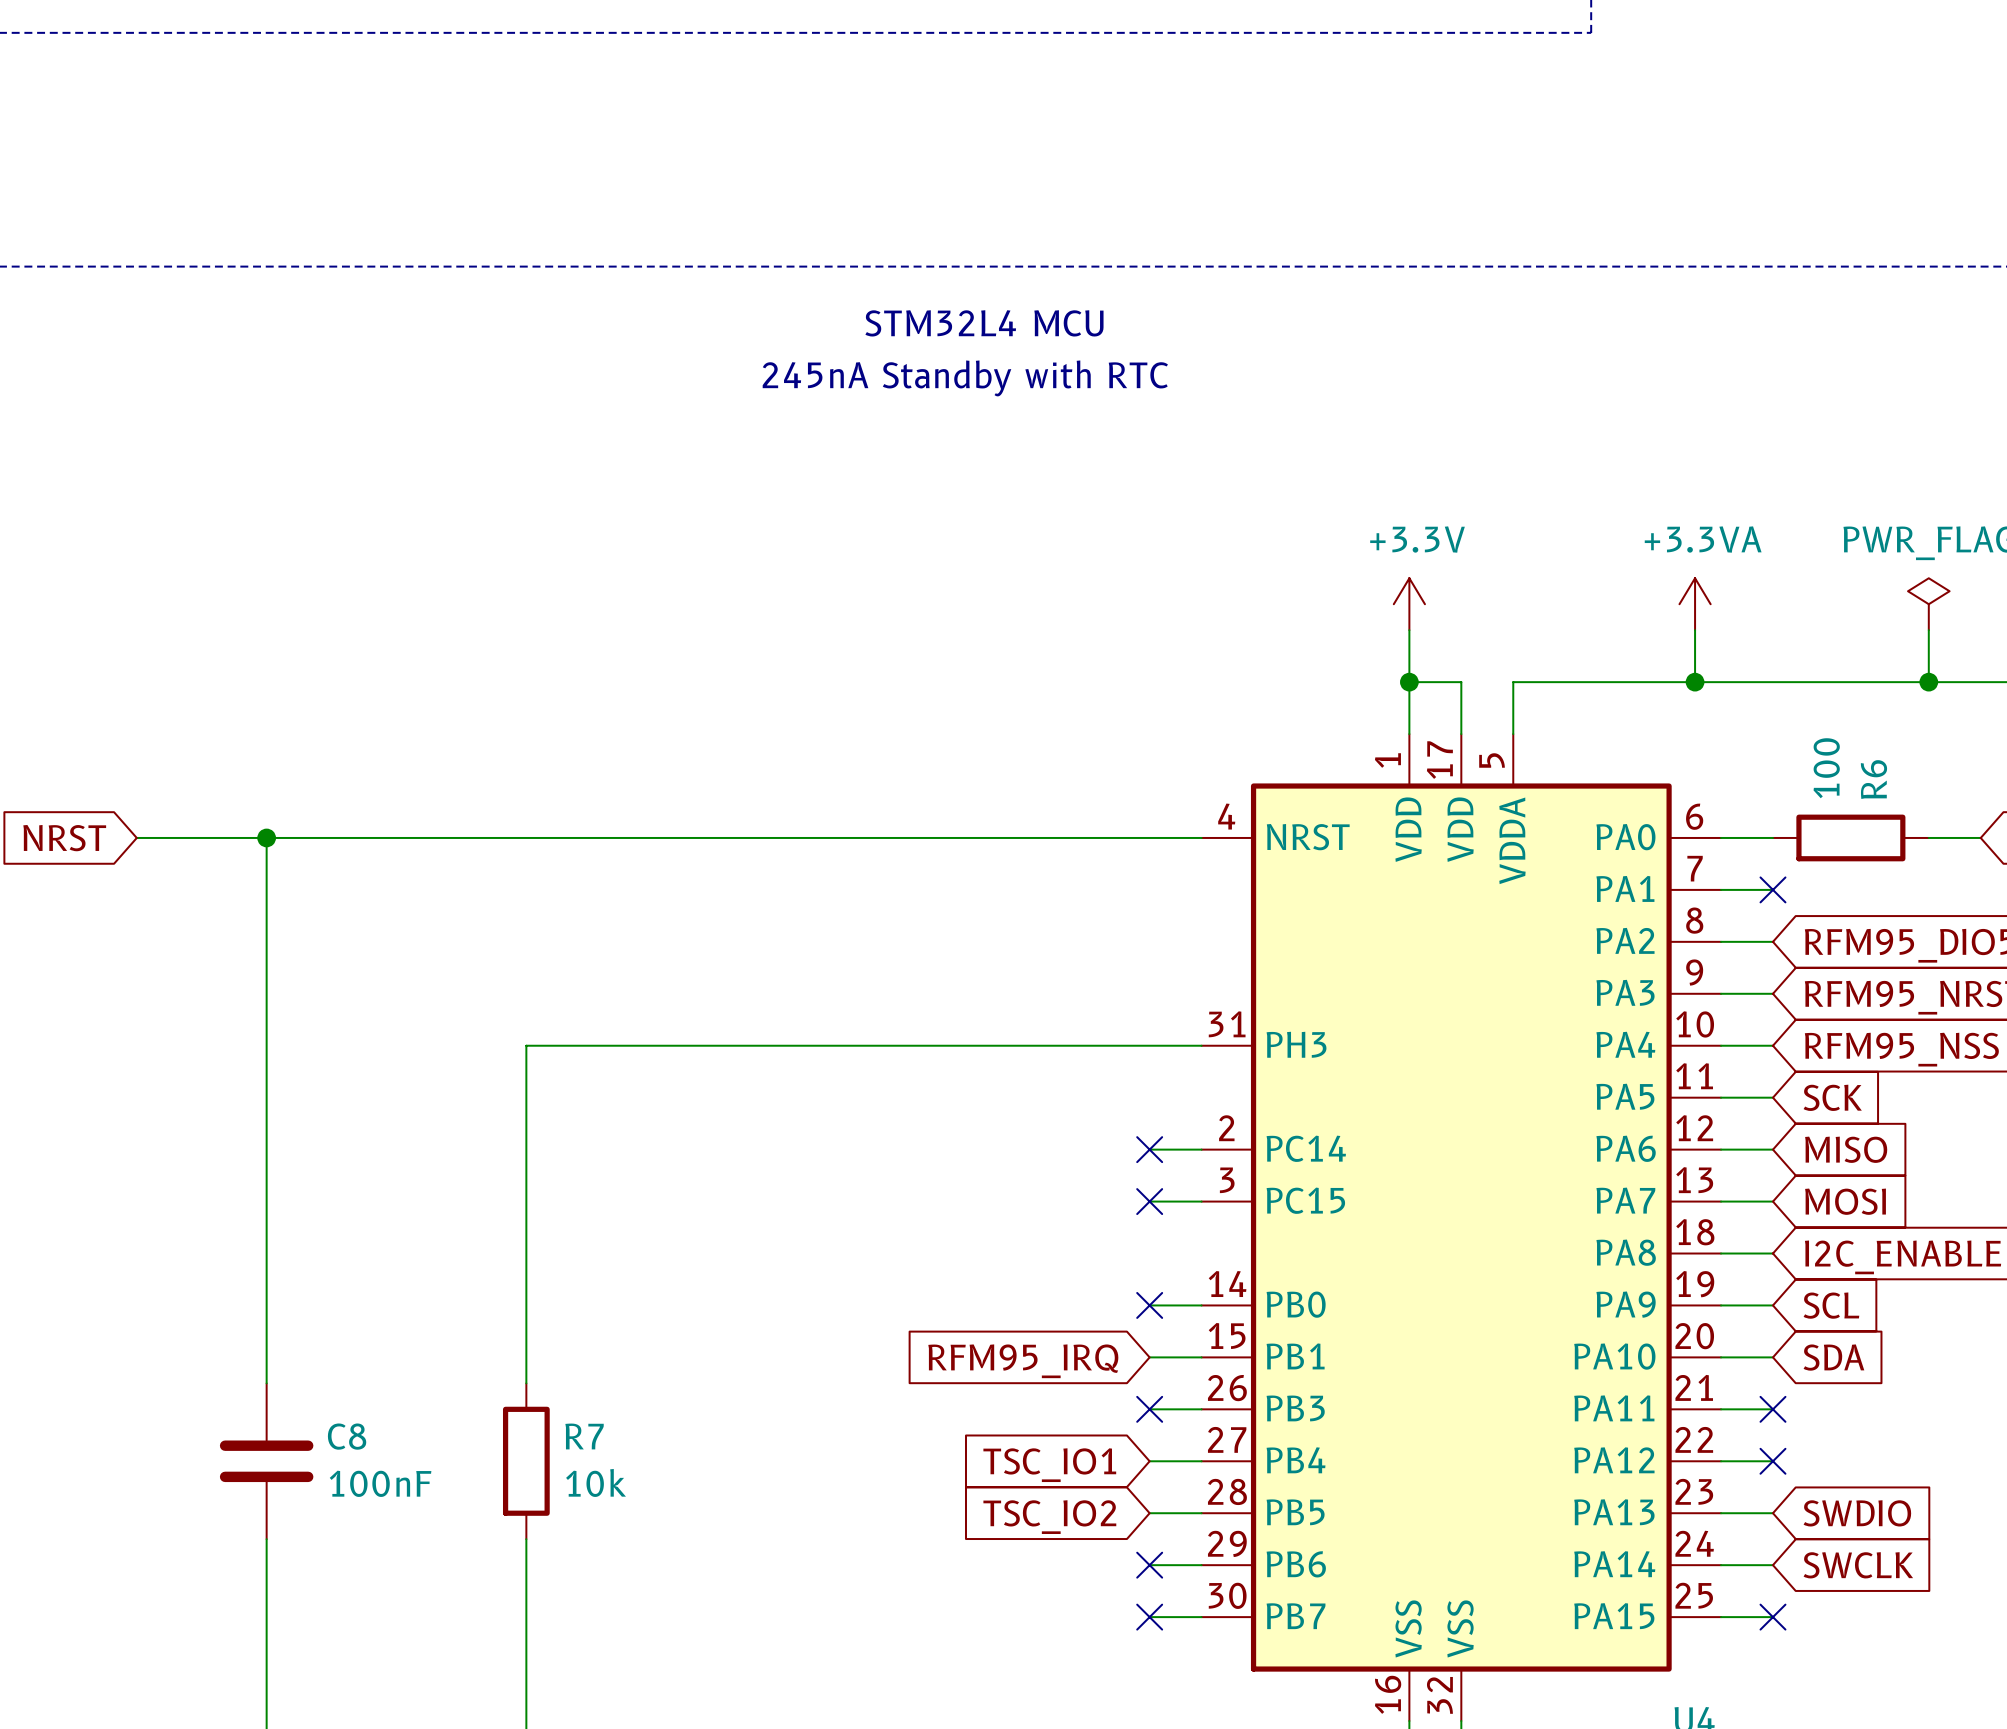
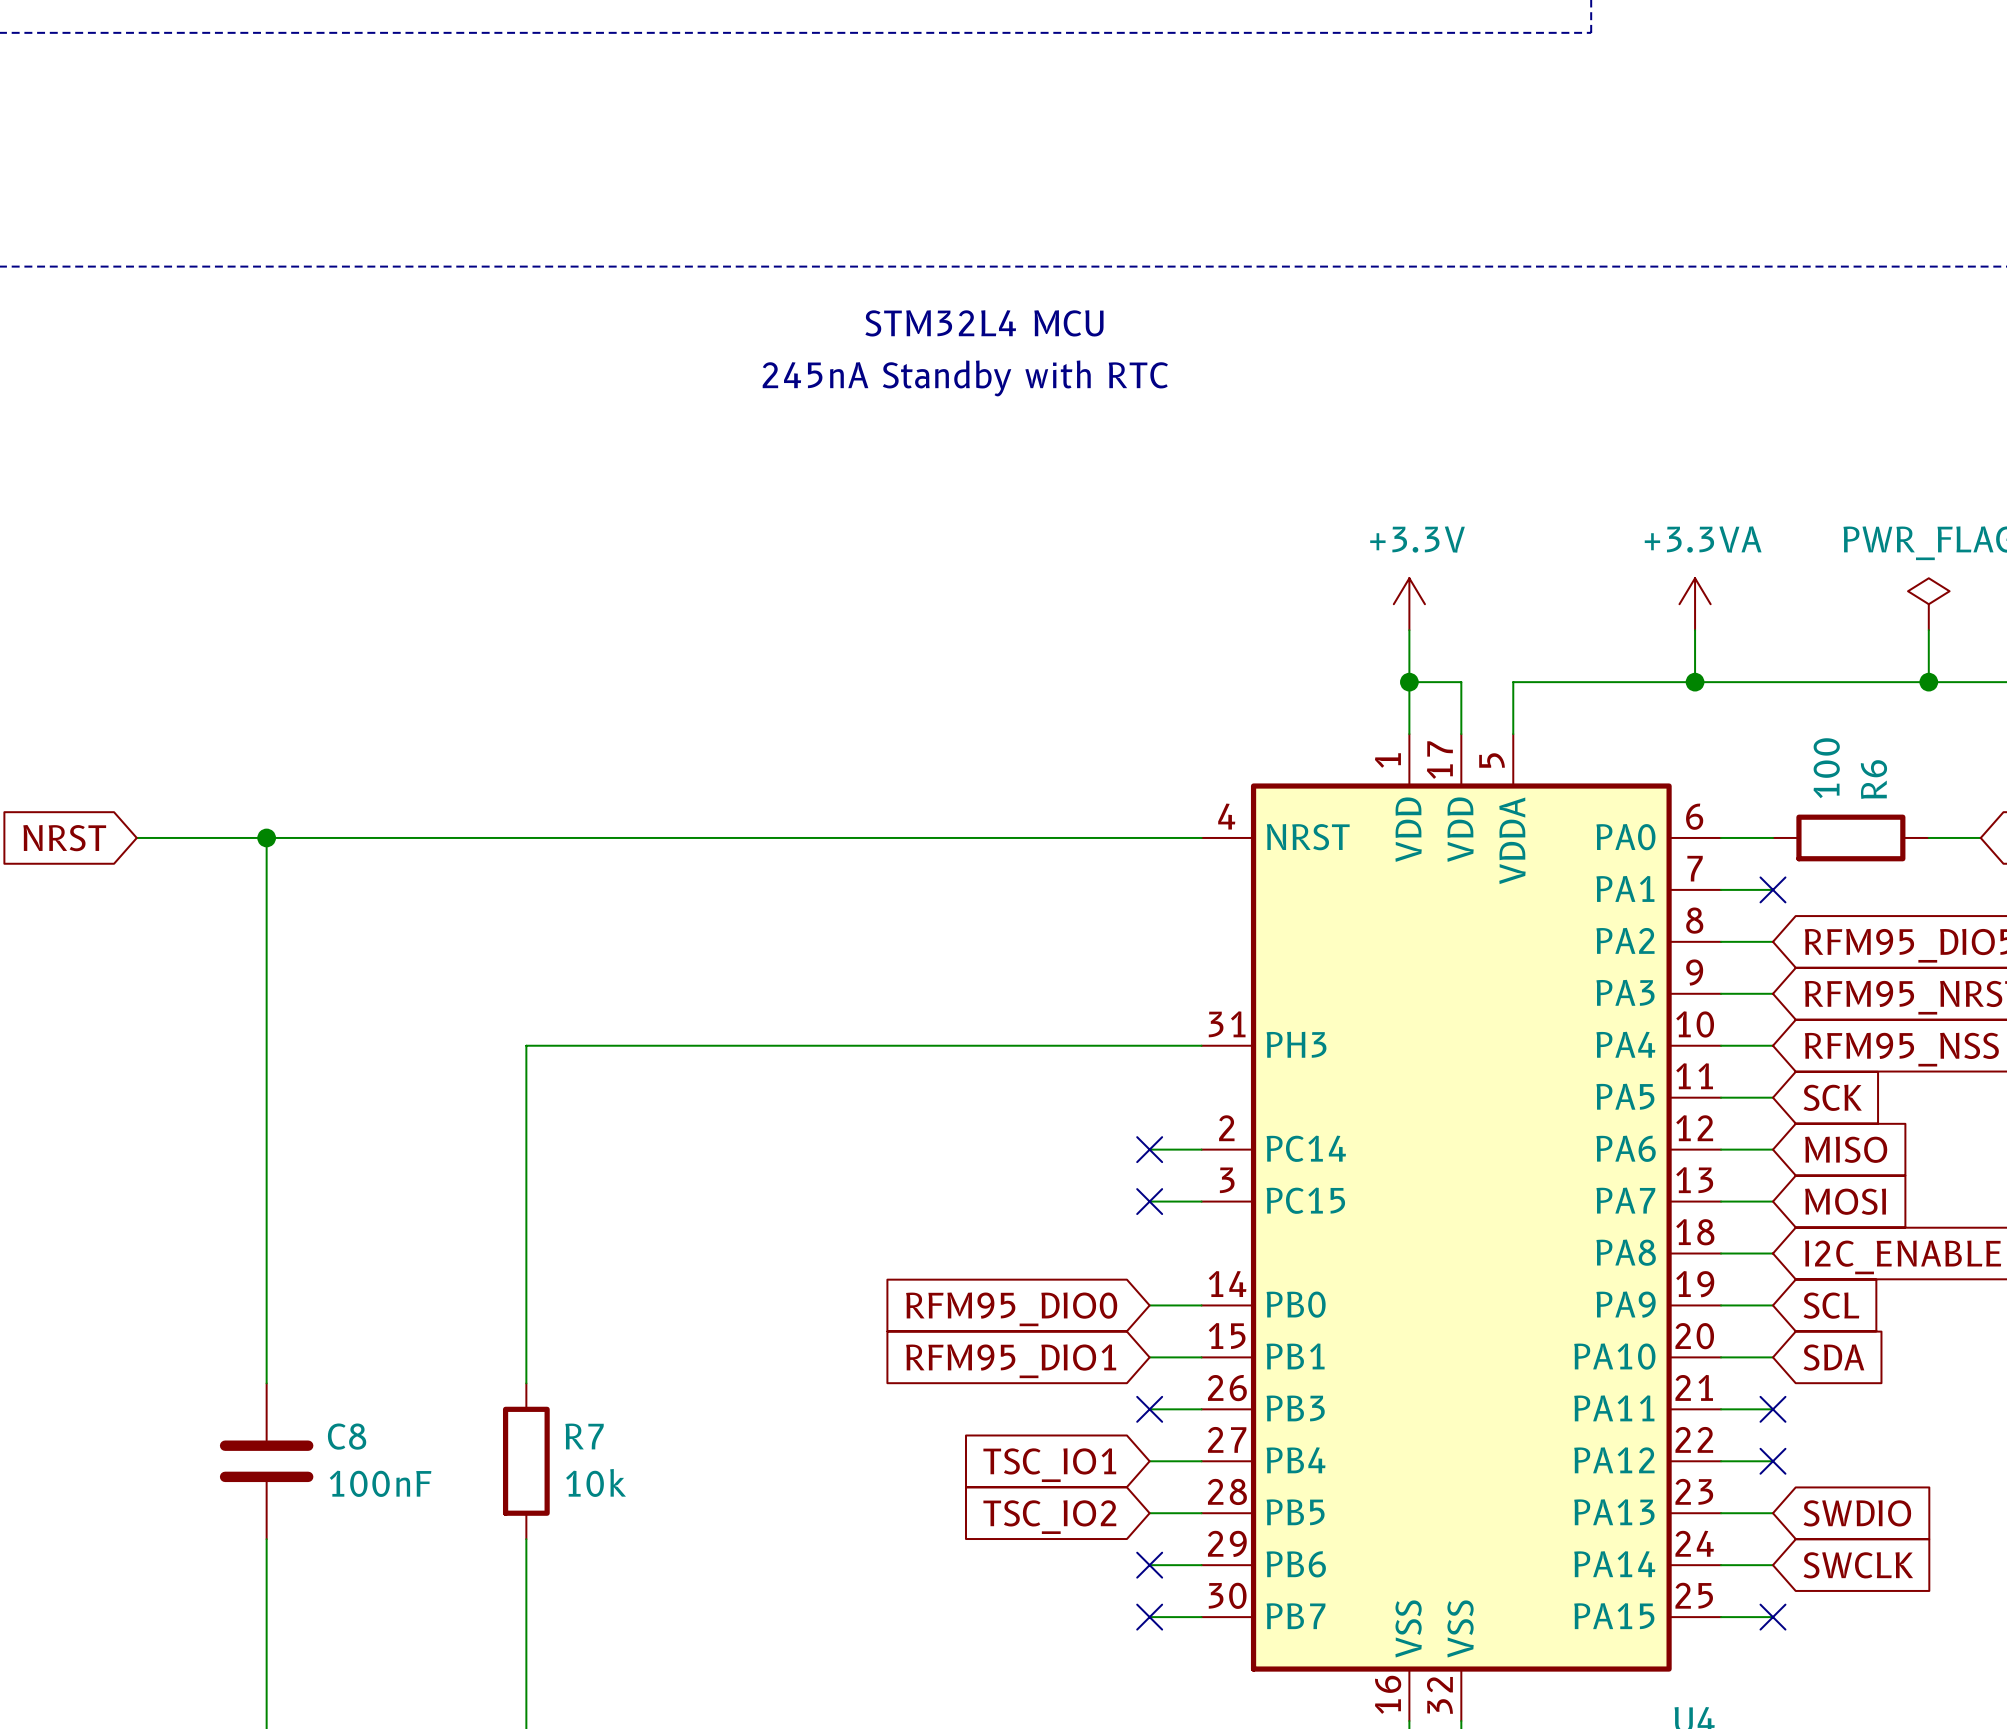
no-connect mark: (1149, 1305) -> none
global label: none -> RFM95_DIO0 (1011, 1309)
global label: RFM95_IRQ (1023, 1361) -> RFM95_DIO1 (1011, 1361)

